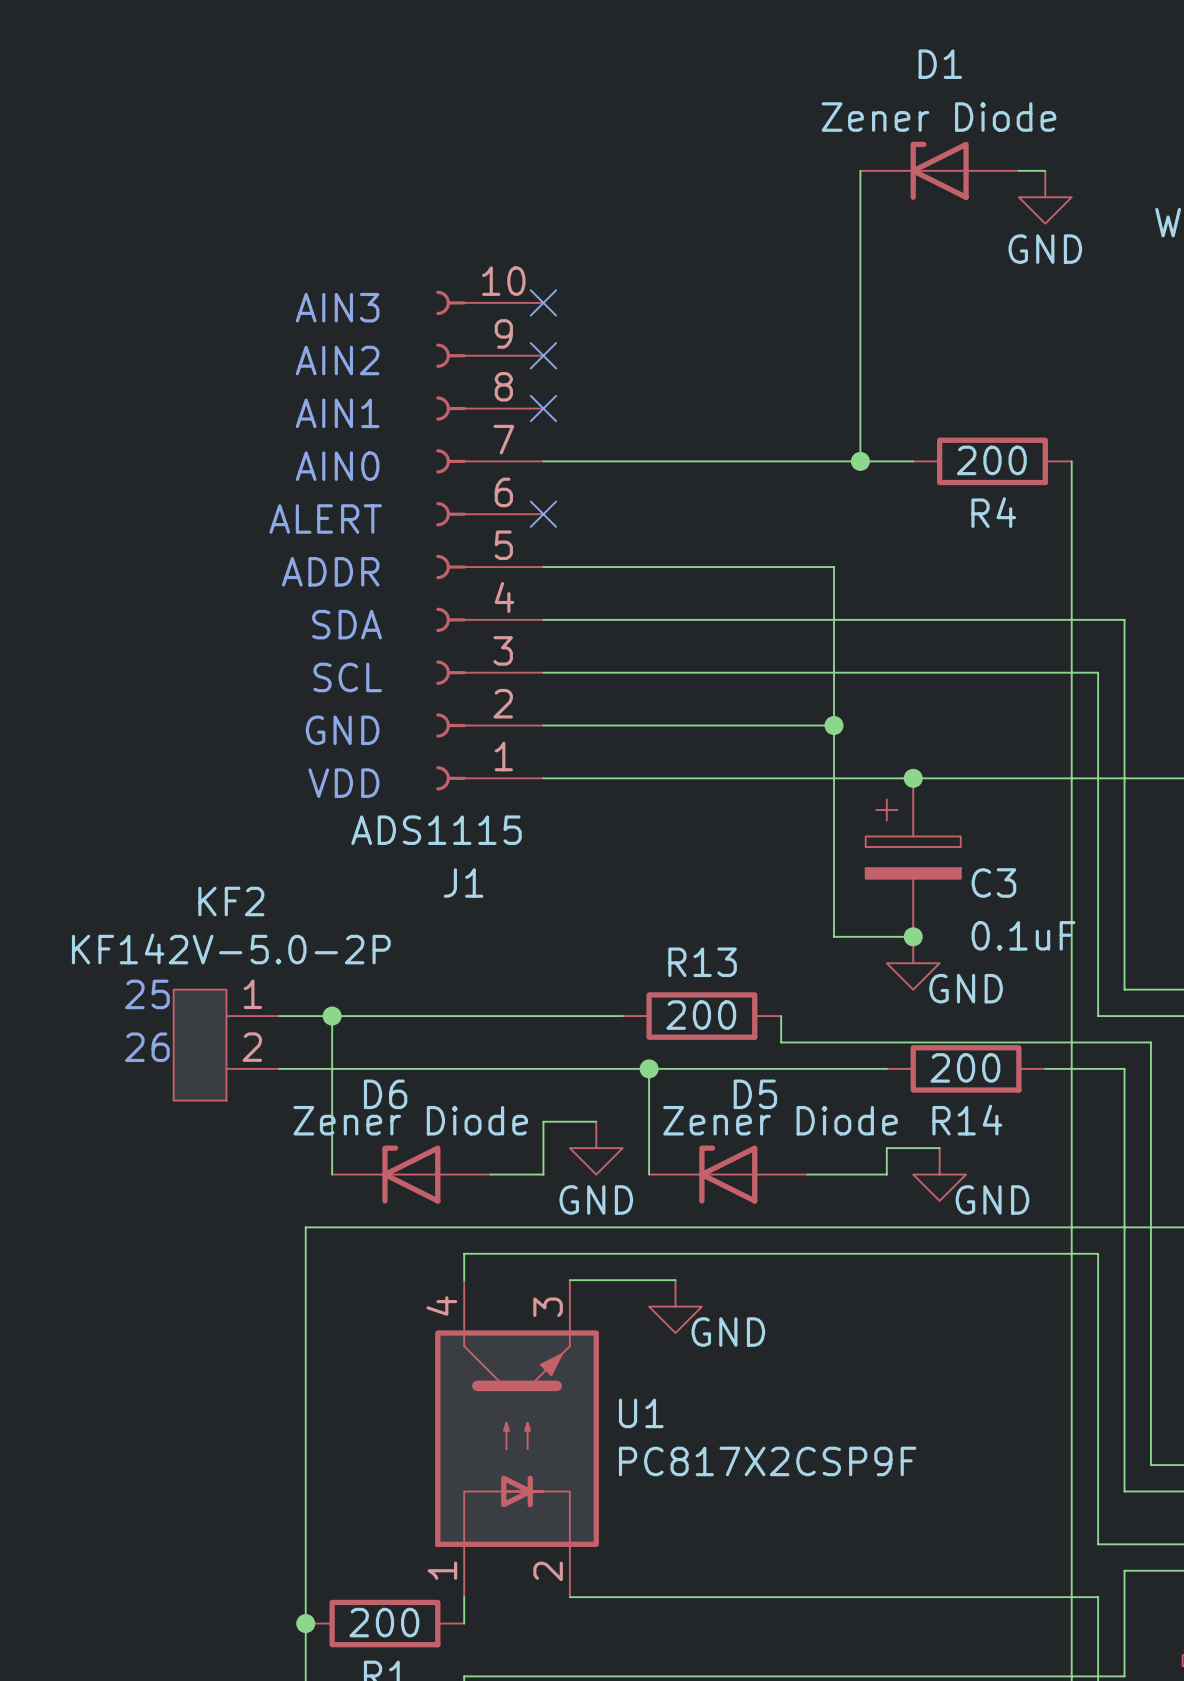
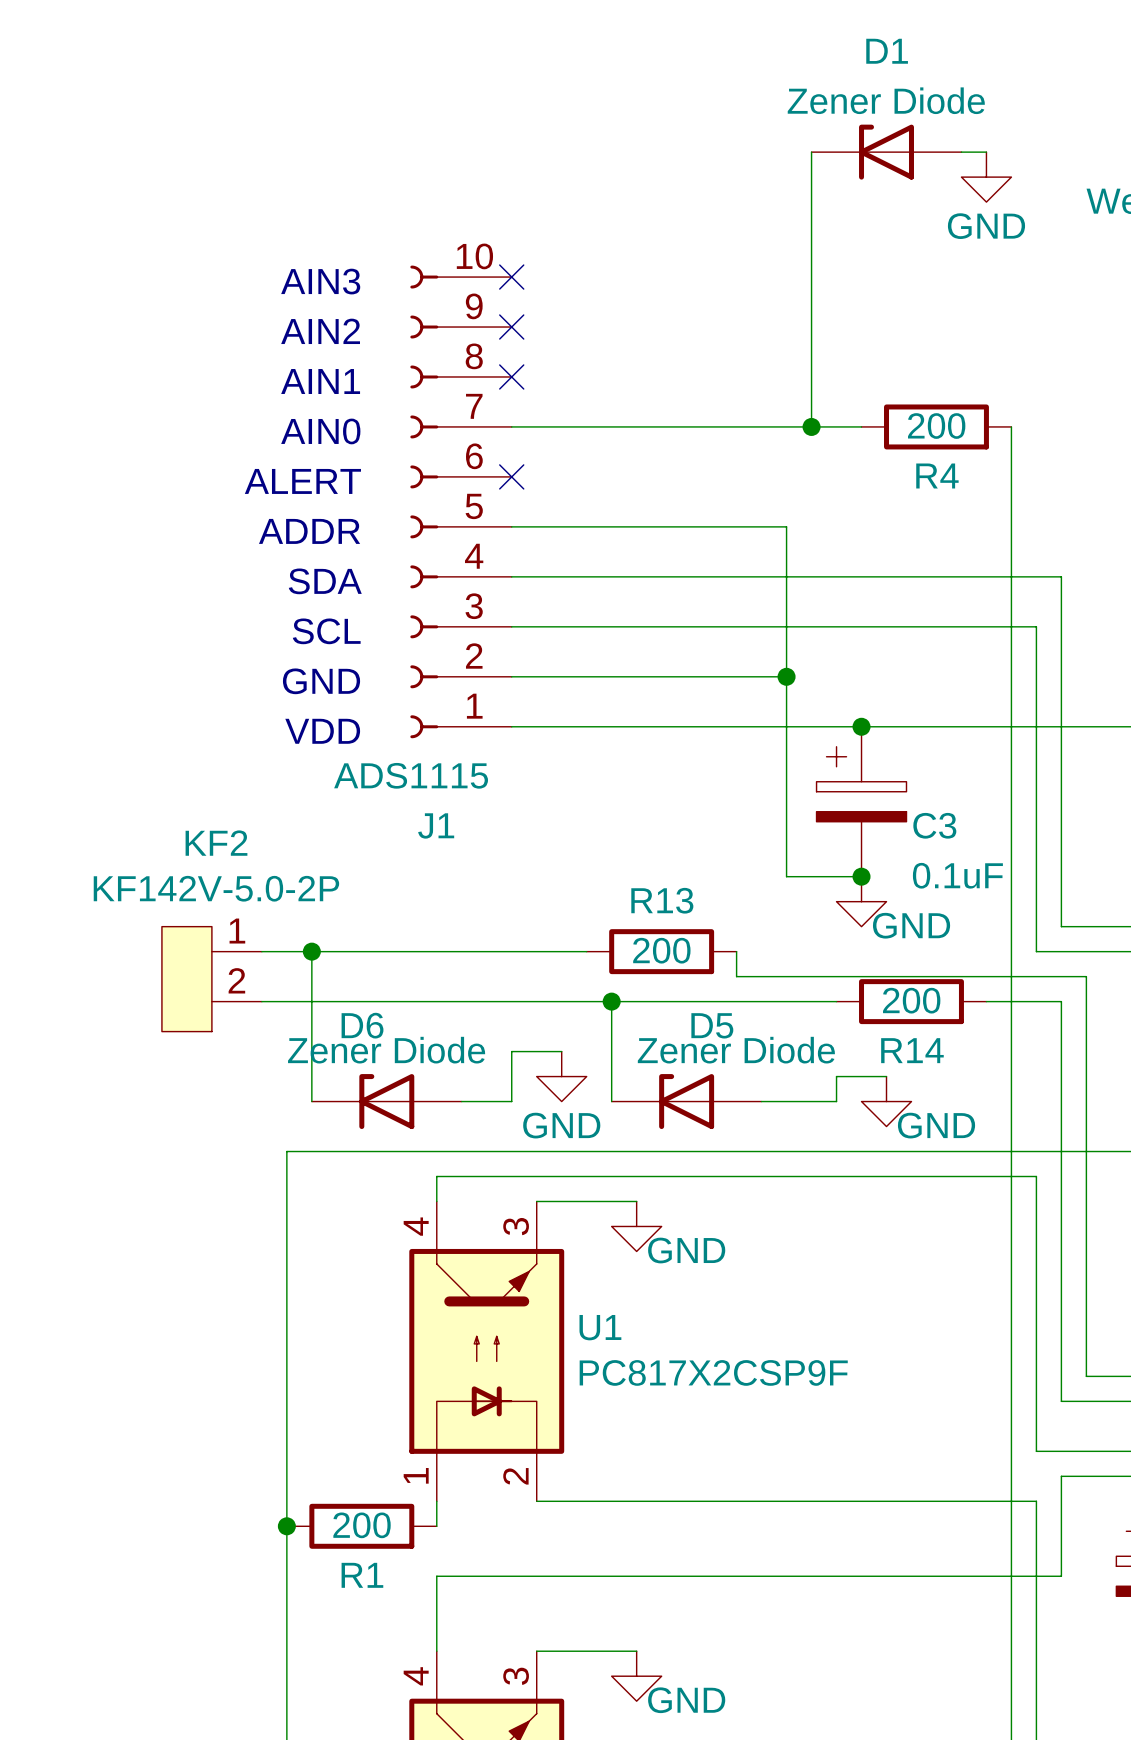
text: 25 (147, 994) -> none
text: 26 (147, 1047) -> none

